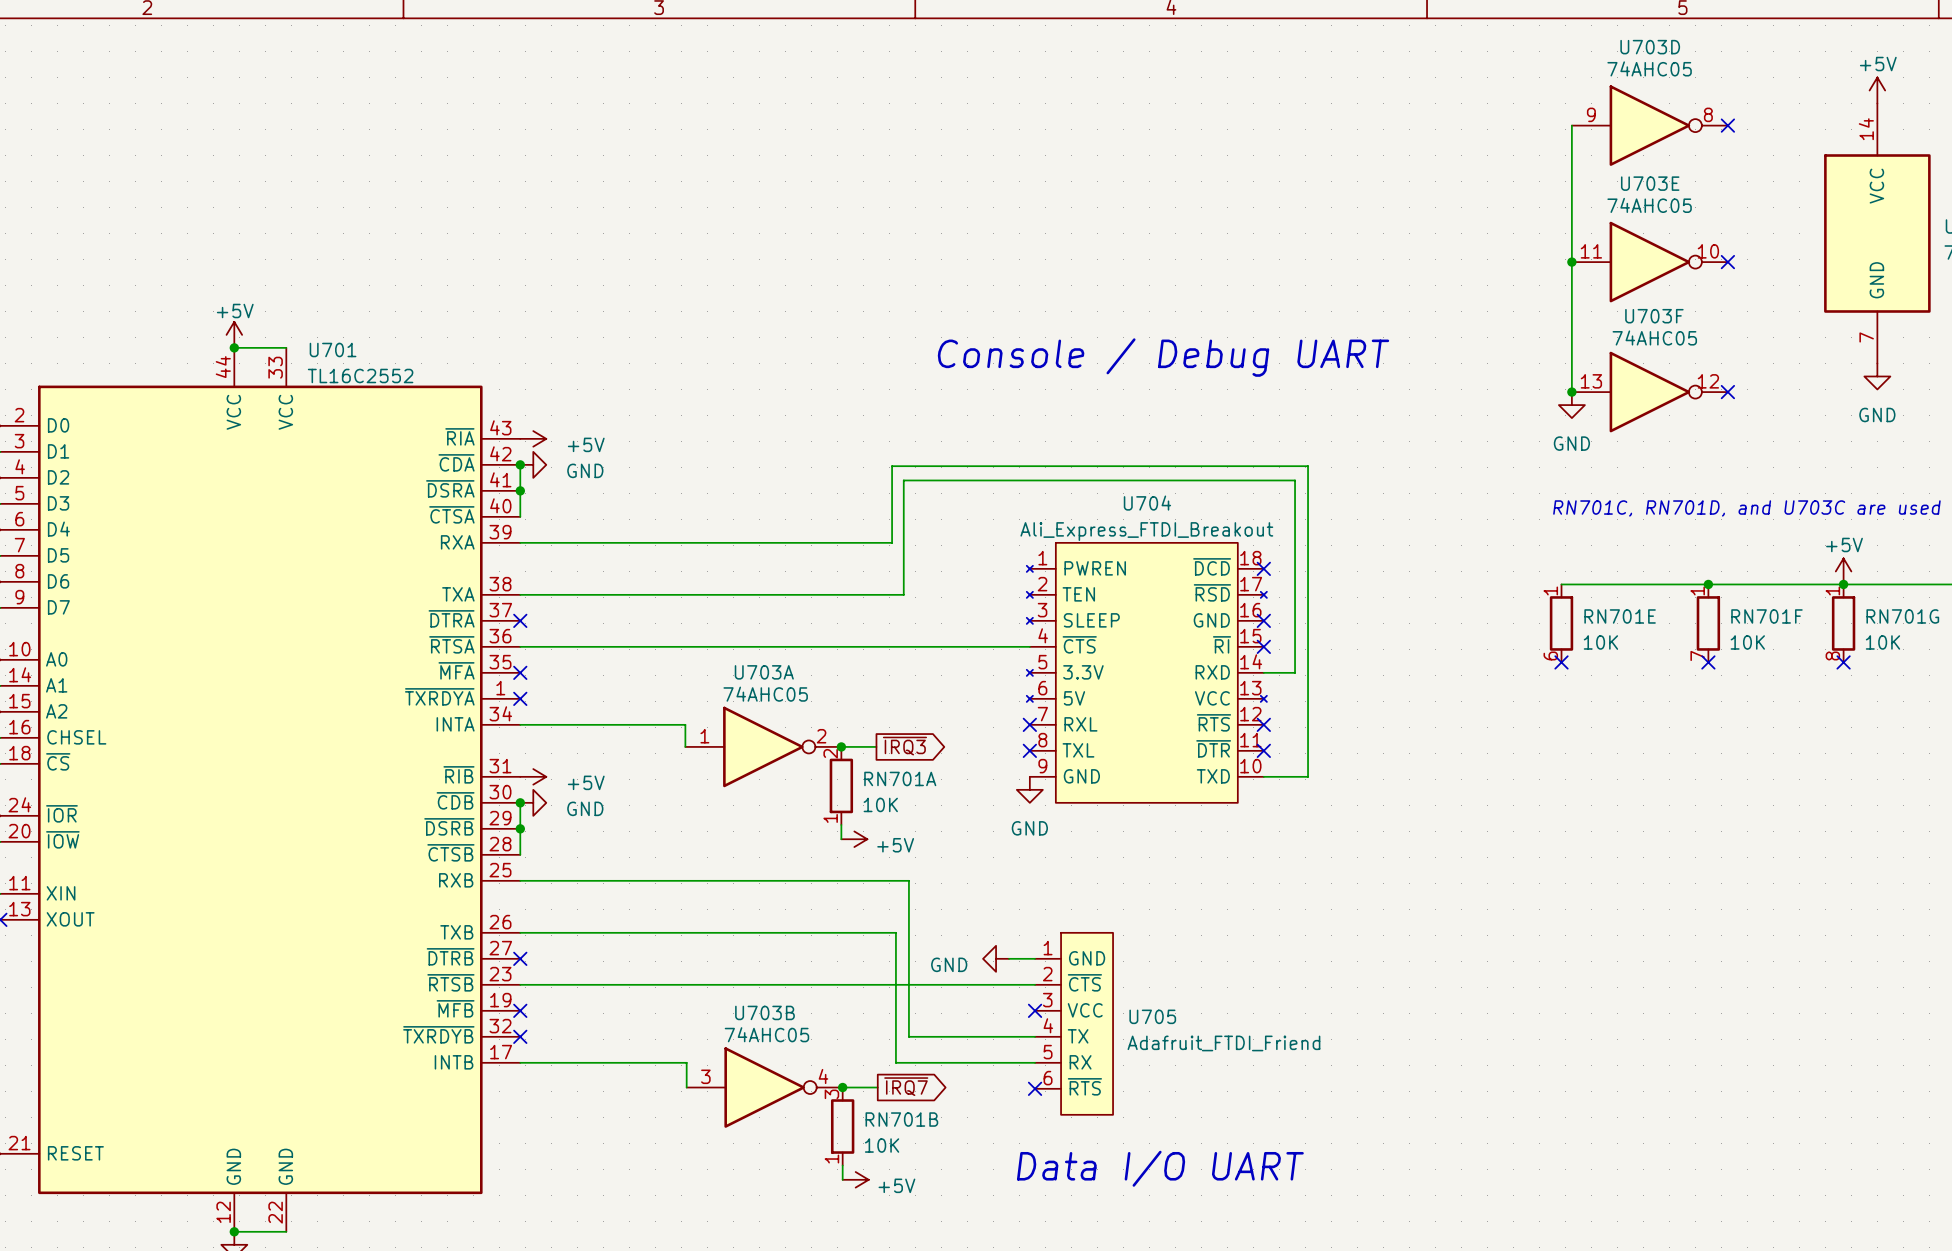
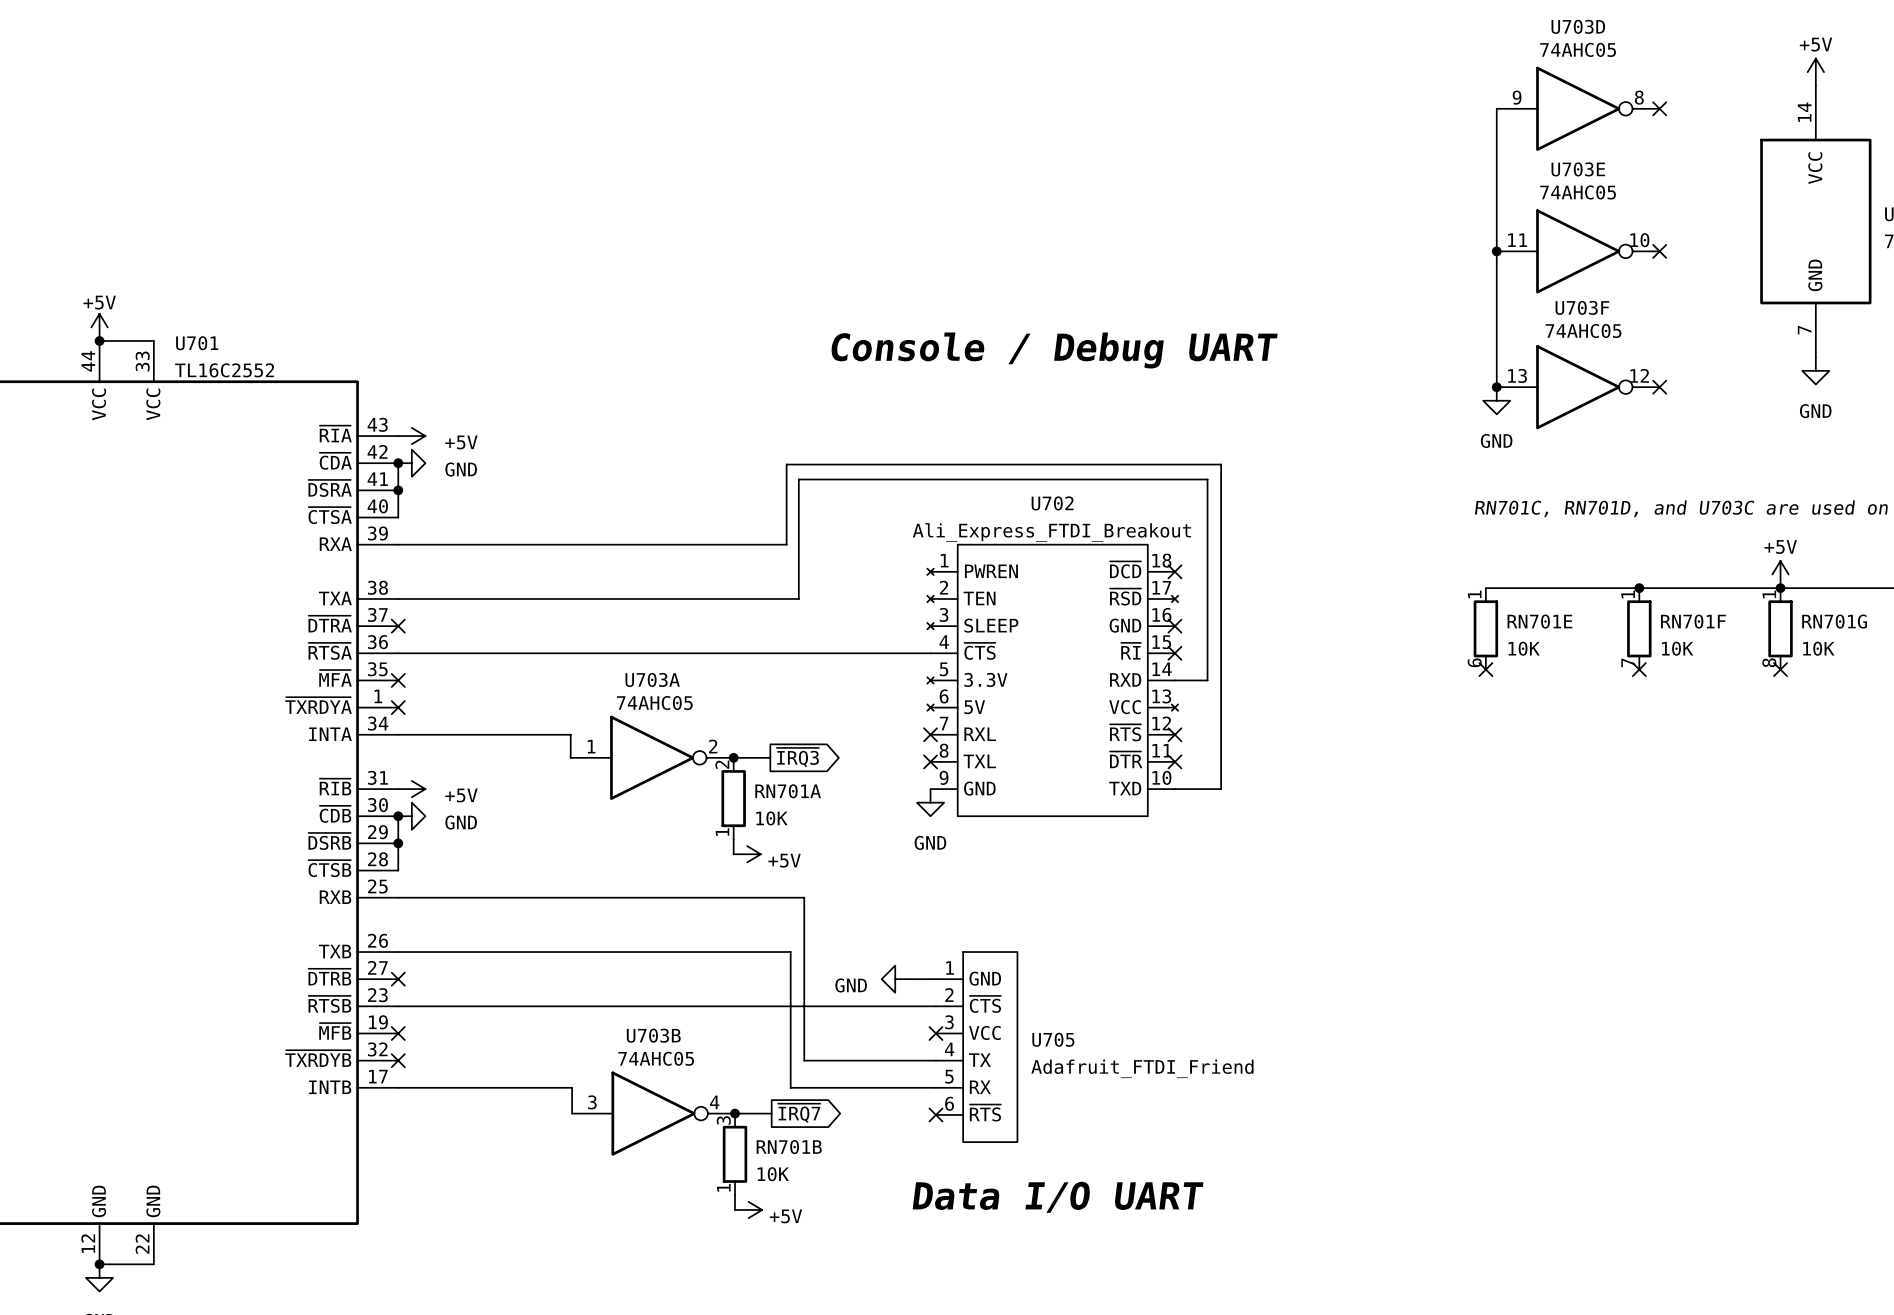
U704 name: U704 (1147, 503) -> U702 (1052, 503)

